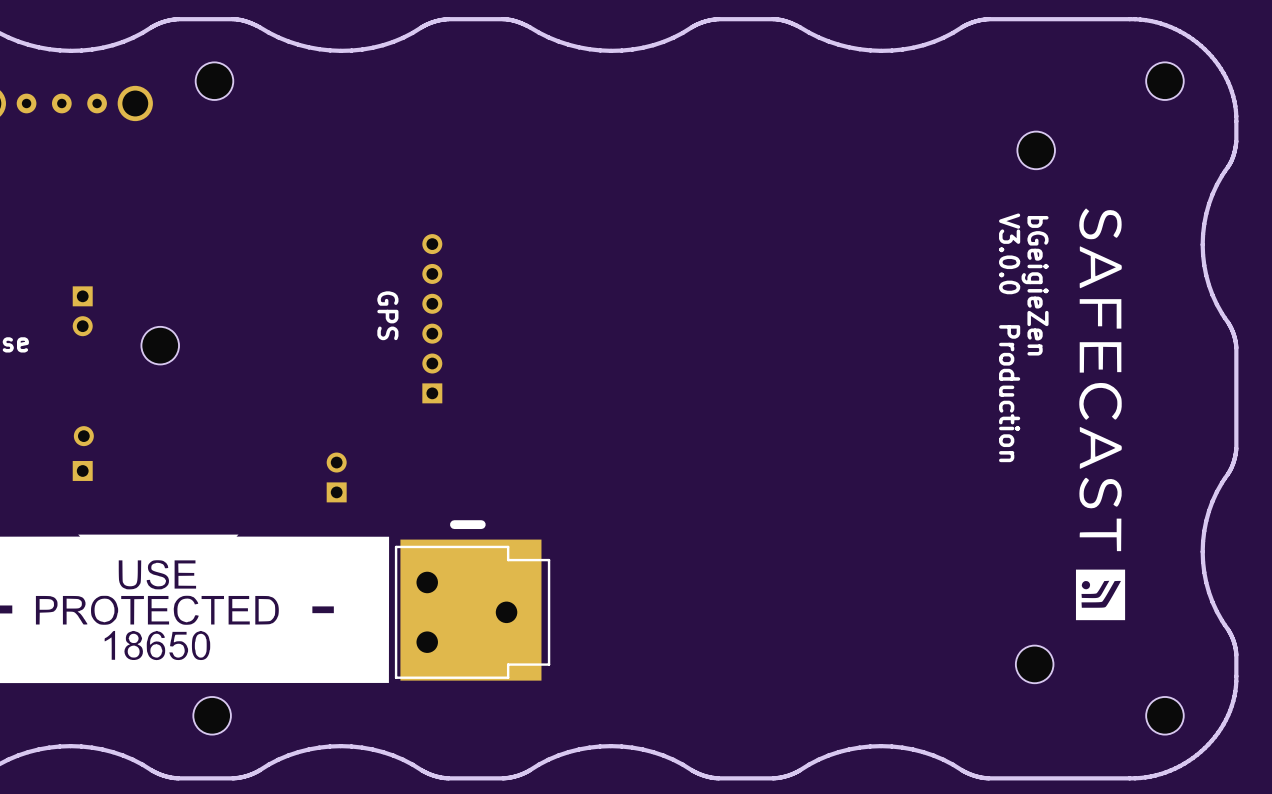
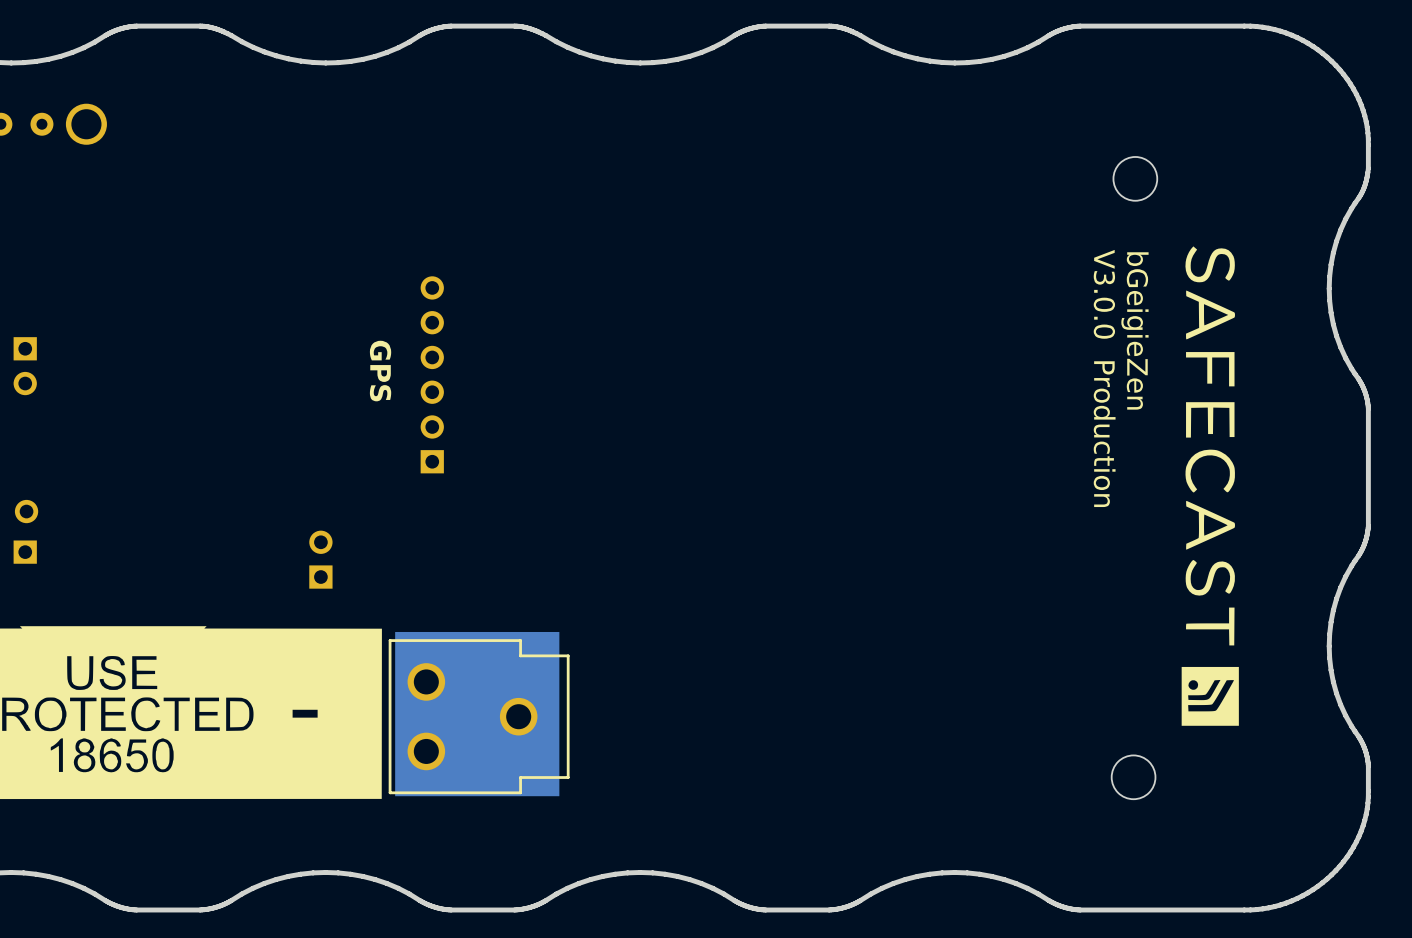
part: (214, 81) -> none
part: (1164, 81) -> none
part: (160, 345) -> none
part text: - (467, 524) -> none
part: (212, 715) -> none
part: (1164, 715) -> none

